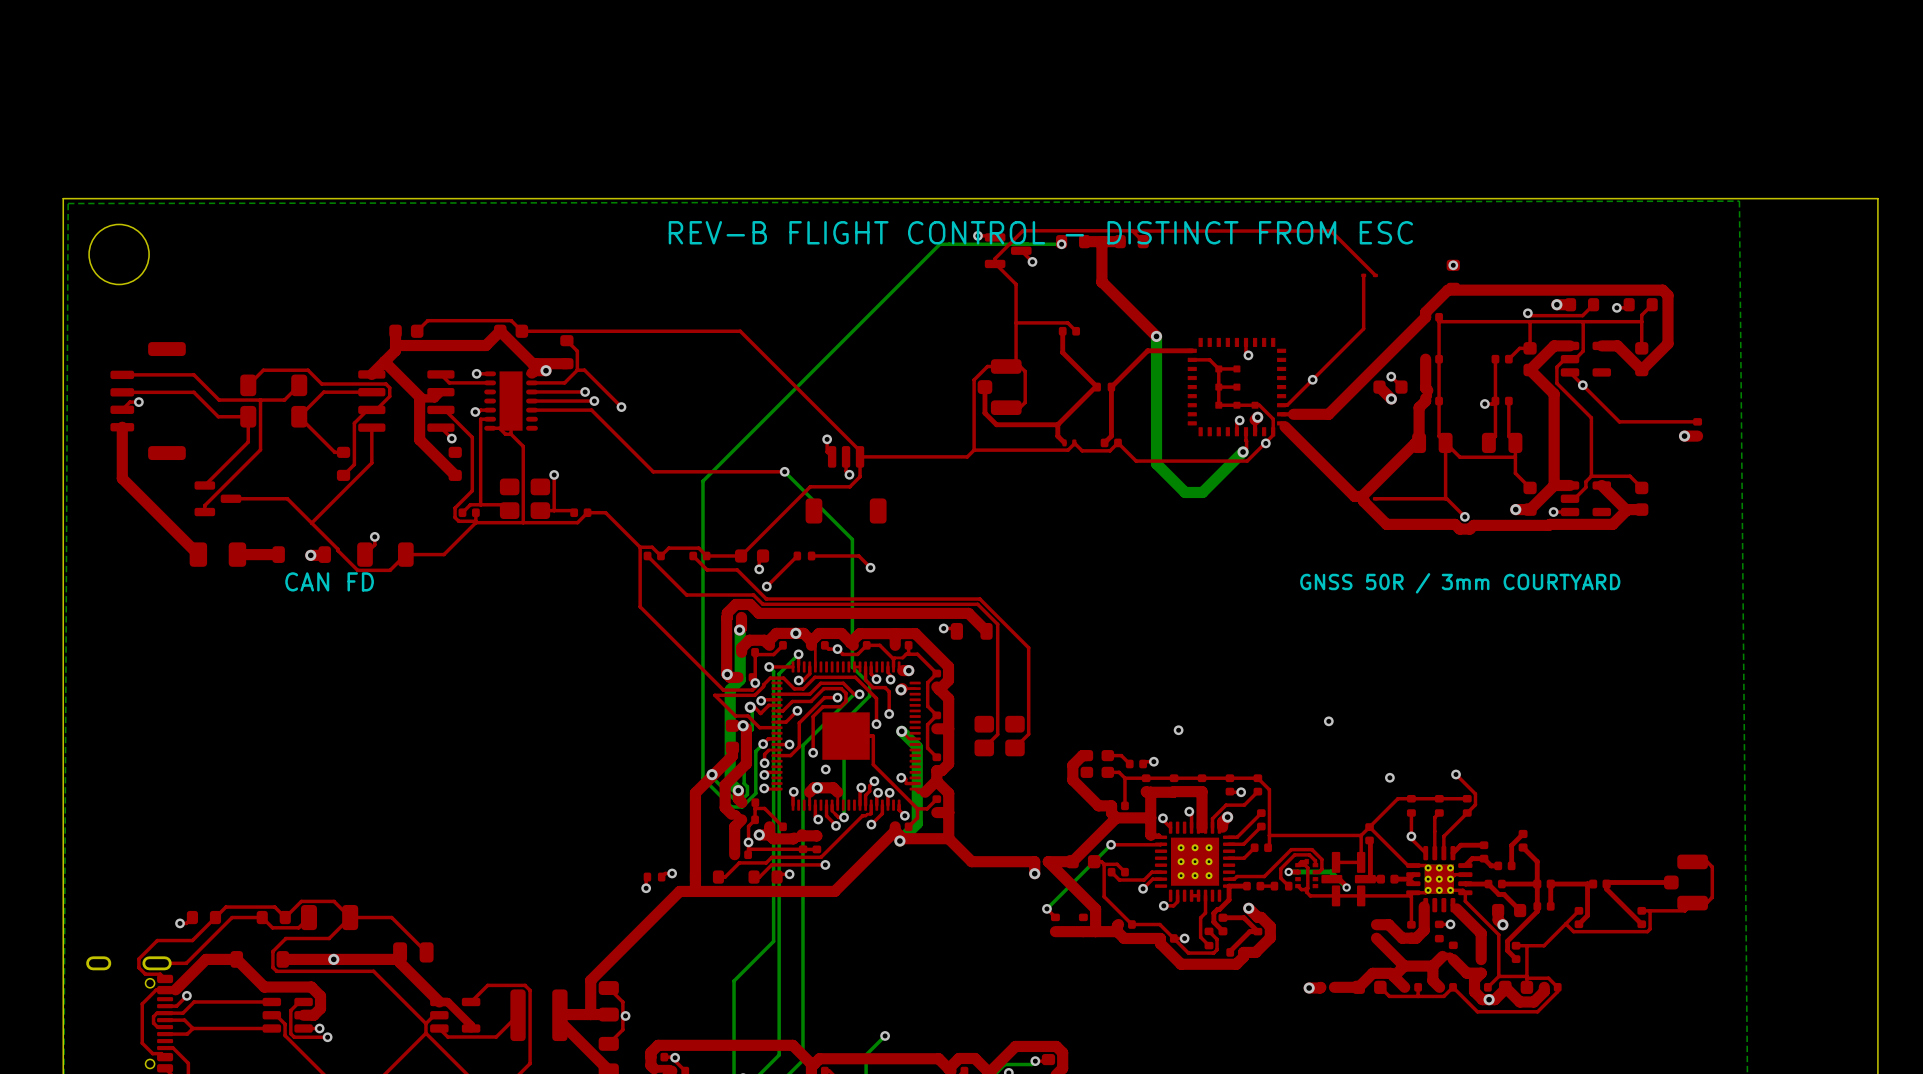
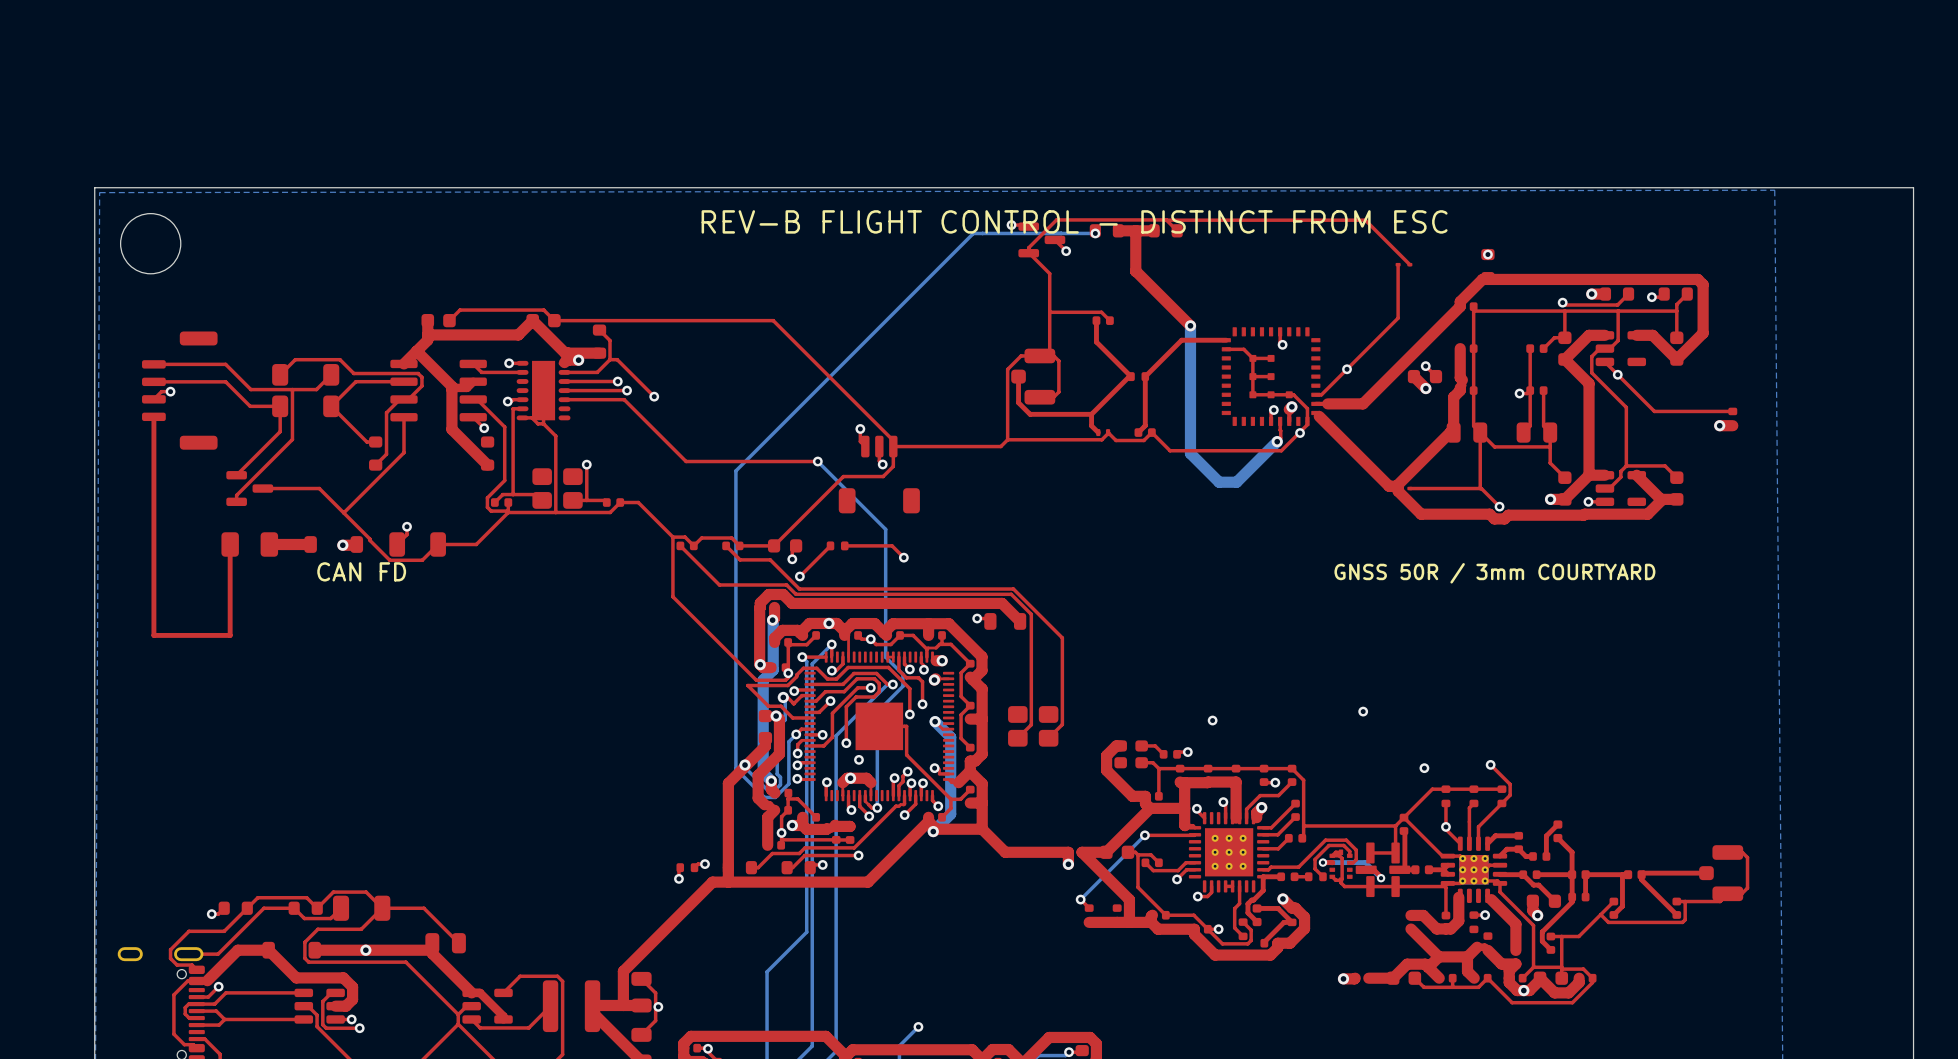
top track width: thick (122, 427) (122, 478) -> thin (153, 416) (153, 468)
top track: (122, 478) (198, 554) -> (153, 468) (153, 635) (230, 635) (230, 544)

